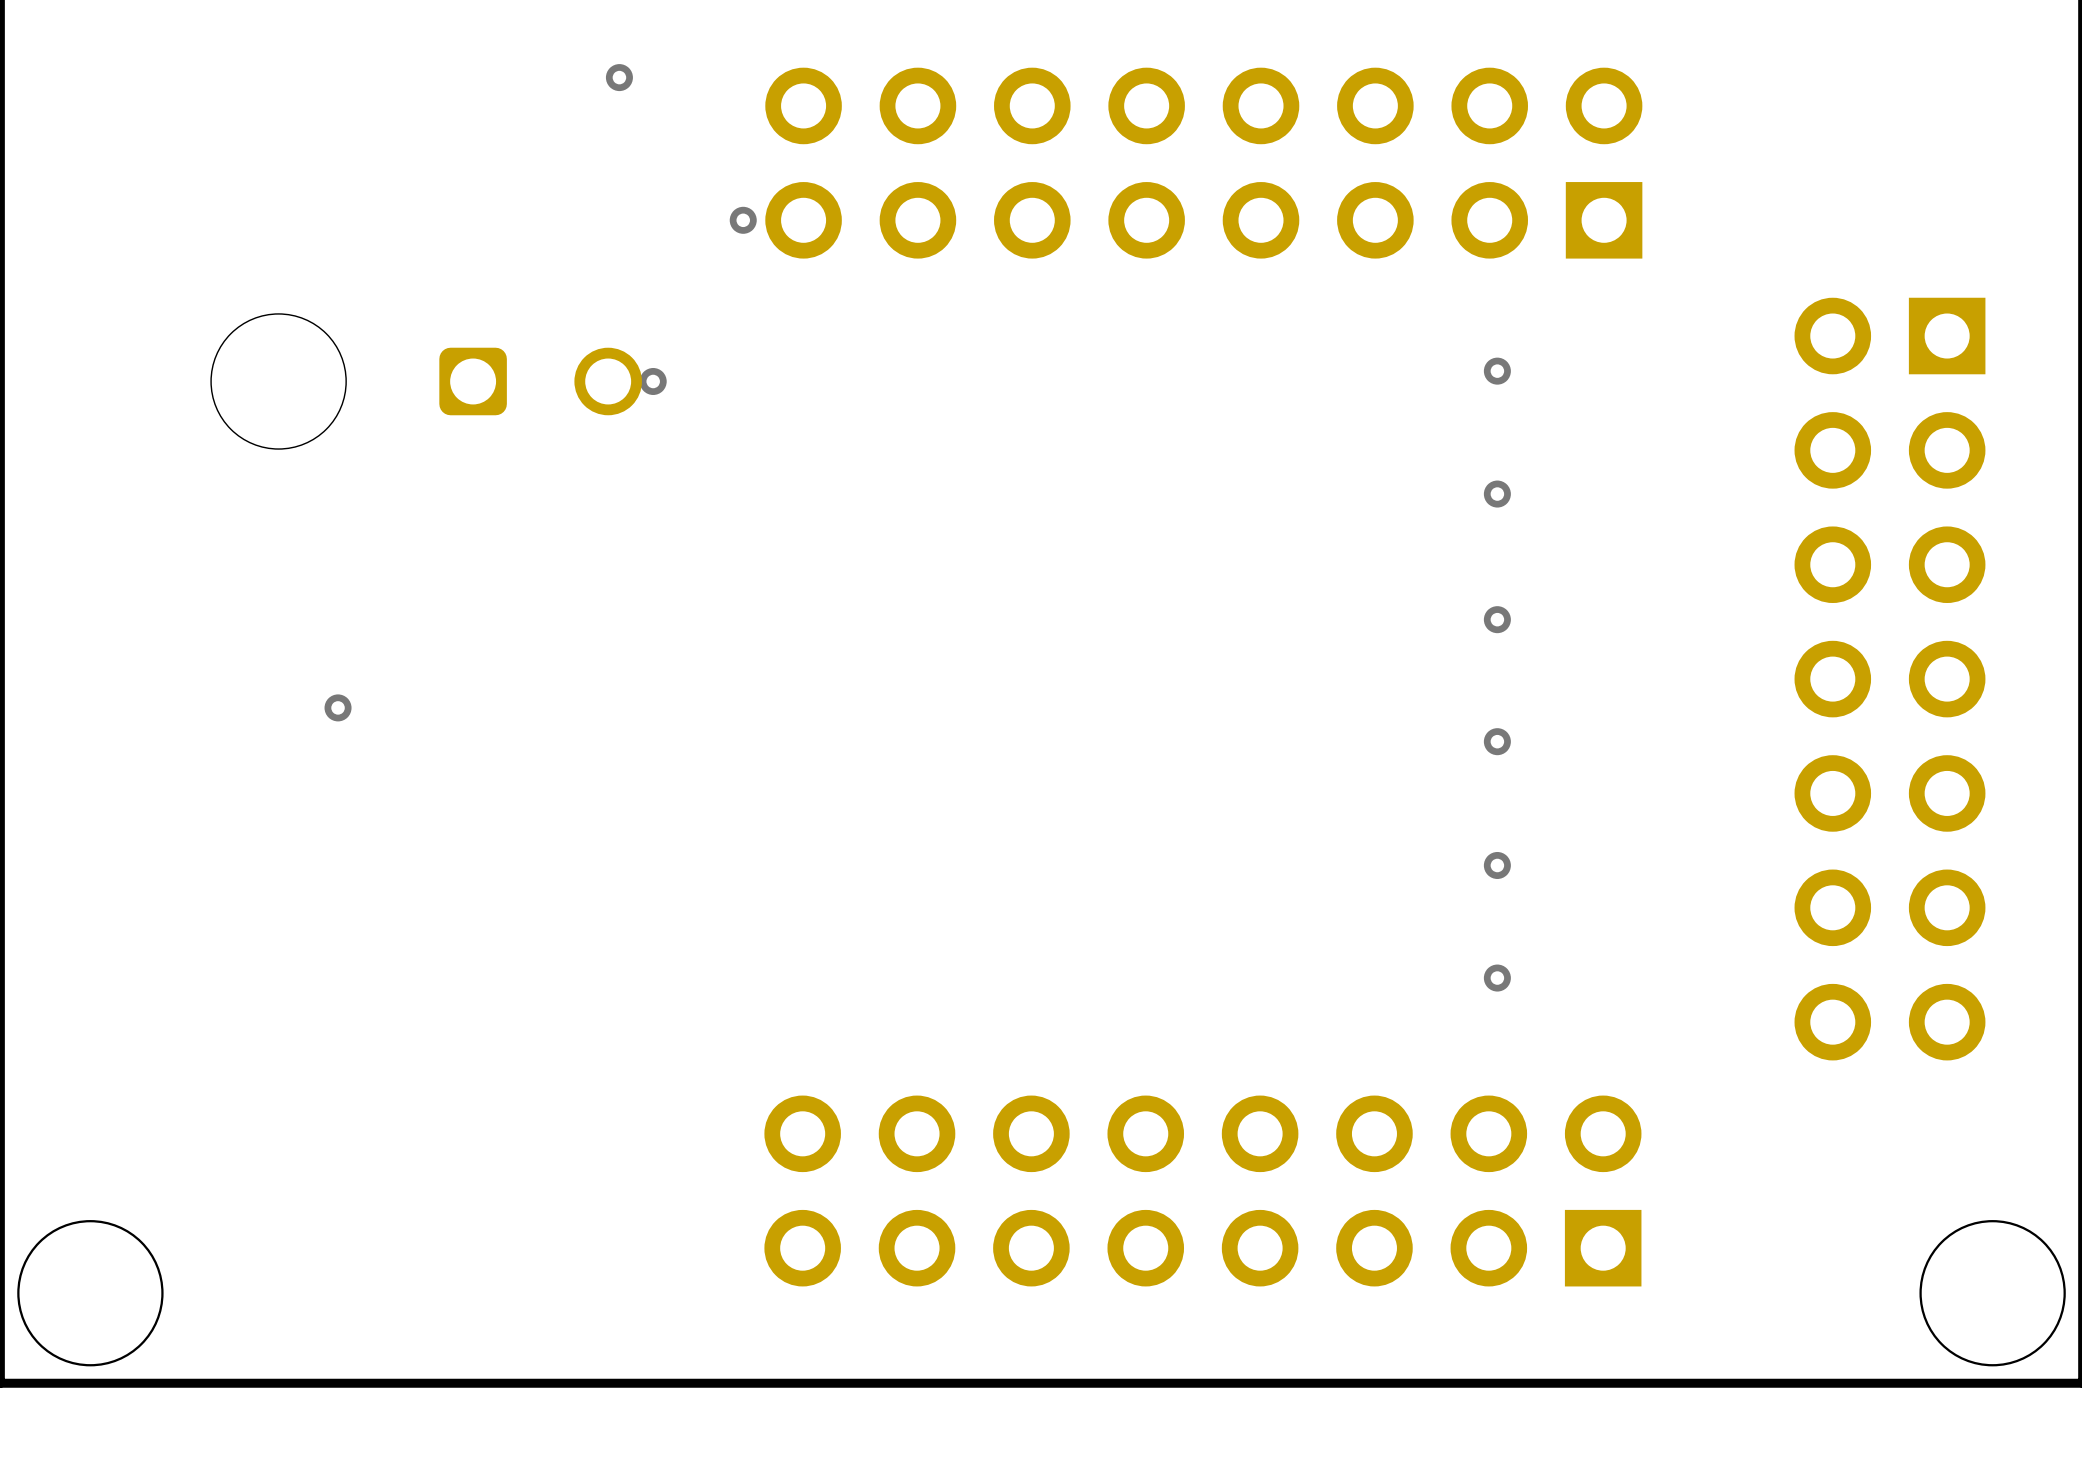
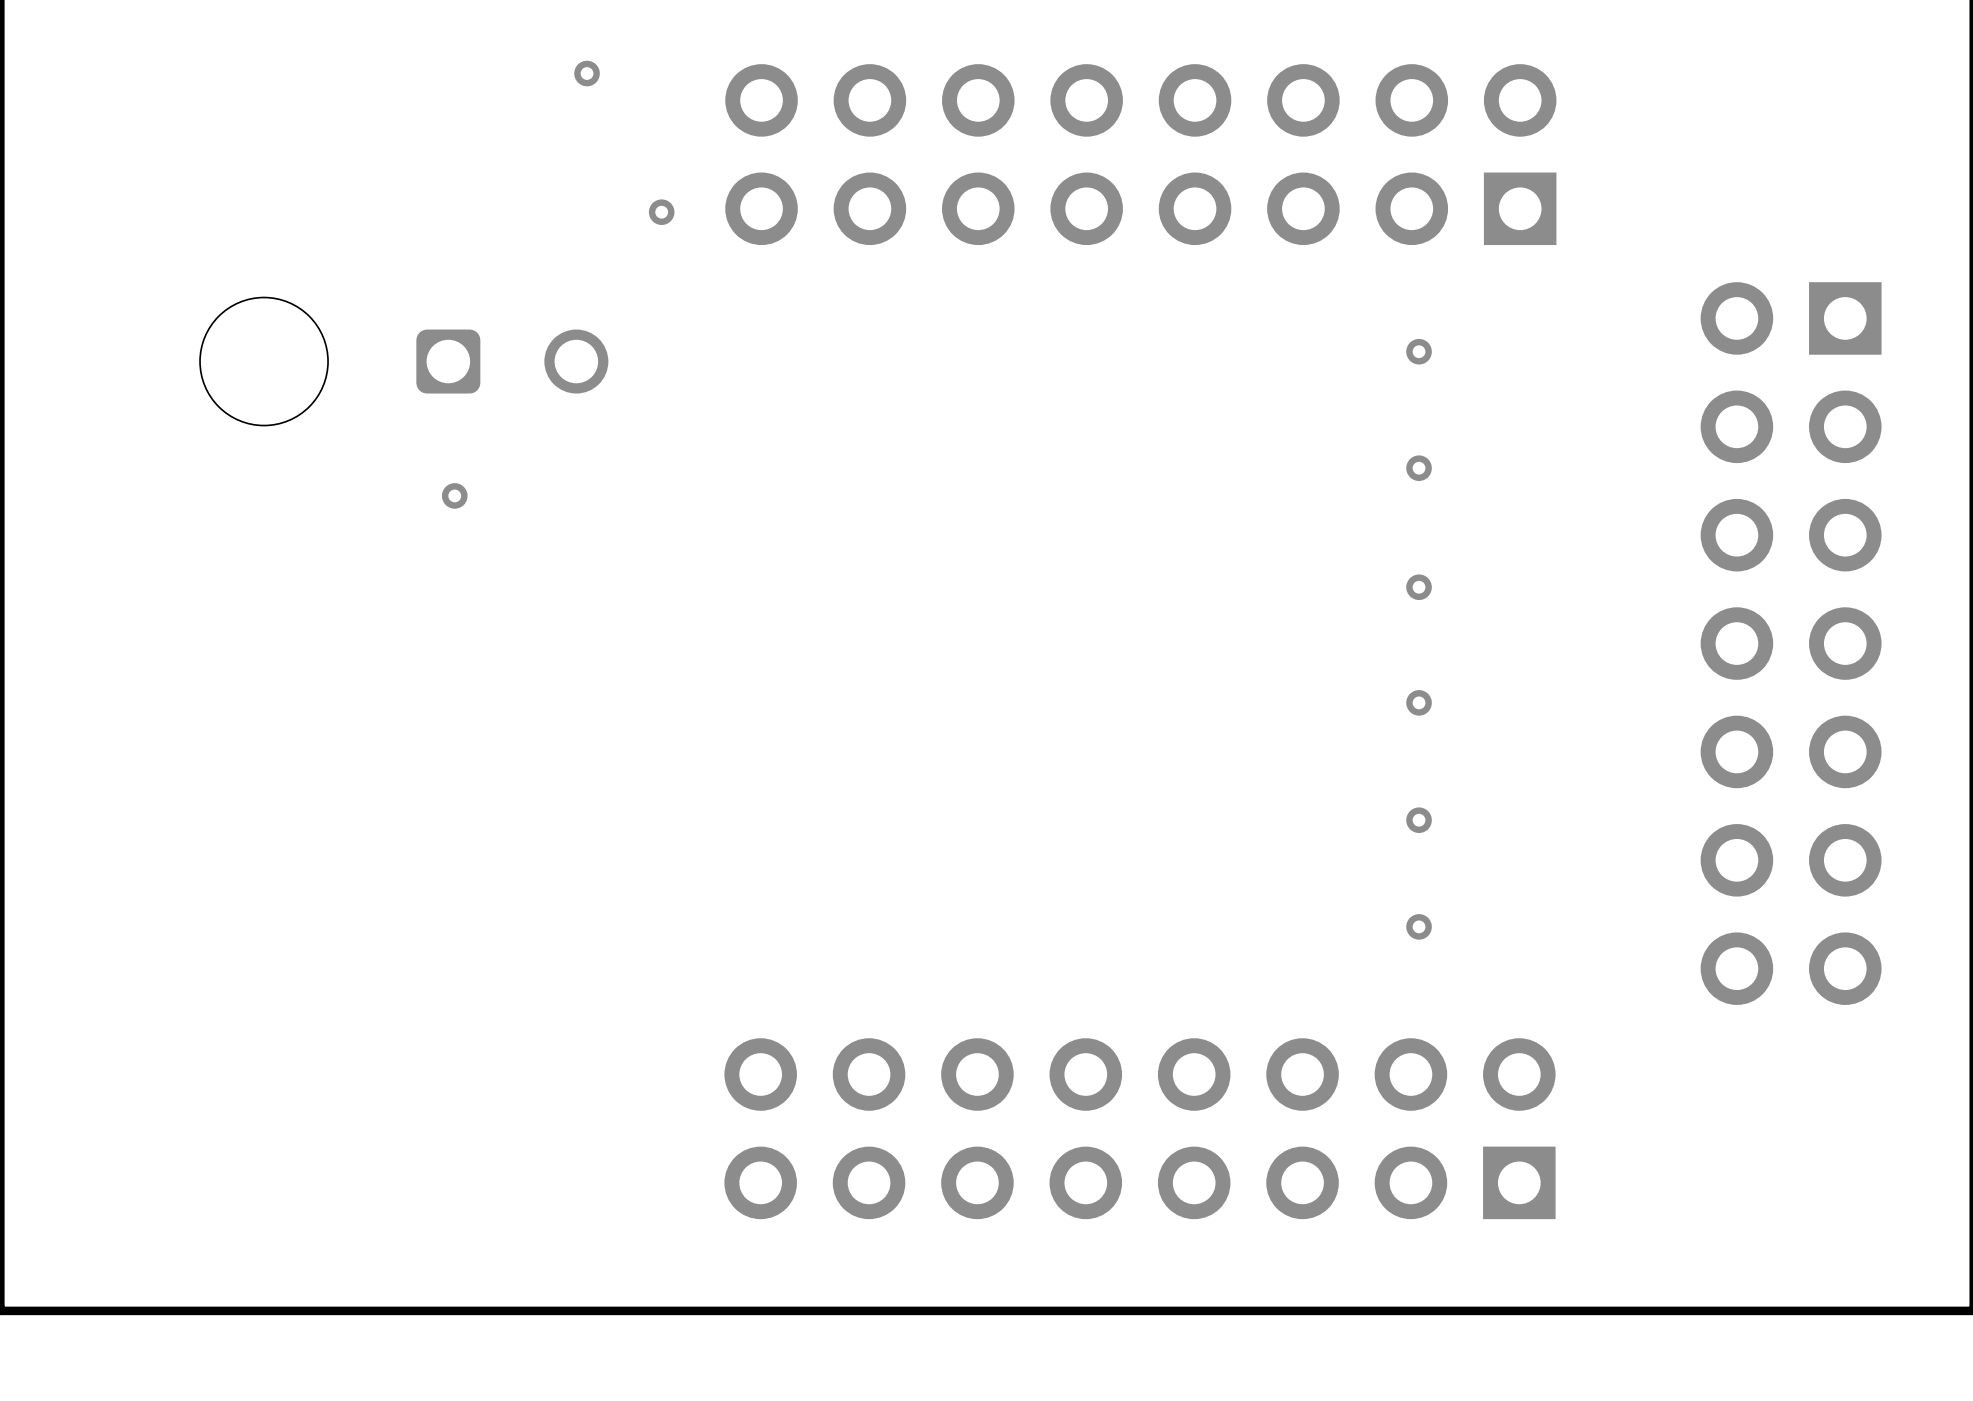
via position: (743, 220) -> (661, 212)
via: (653, 381) -> none
via: none -> (454, 495)
via: (338, 707) -> none
round board edge: [17, 1220, 164, 1367] -> none
round board edge: [1919, 1220, 2066, 1367] -> none

